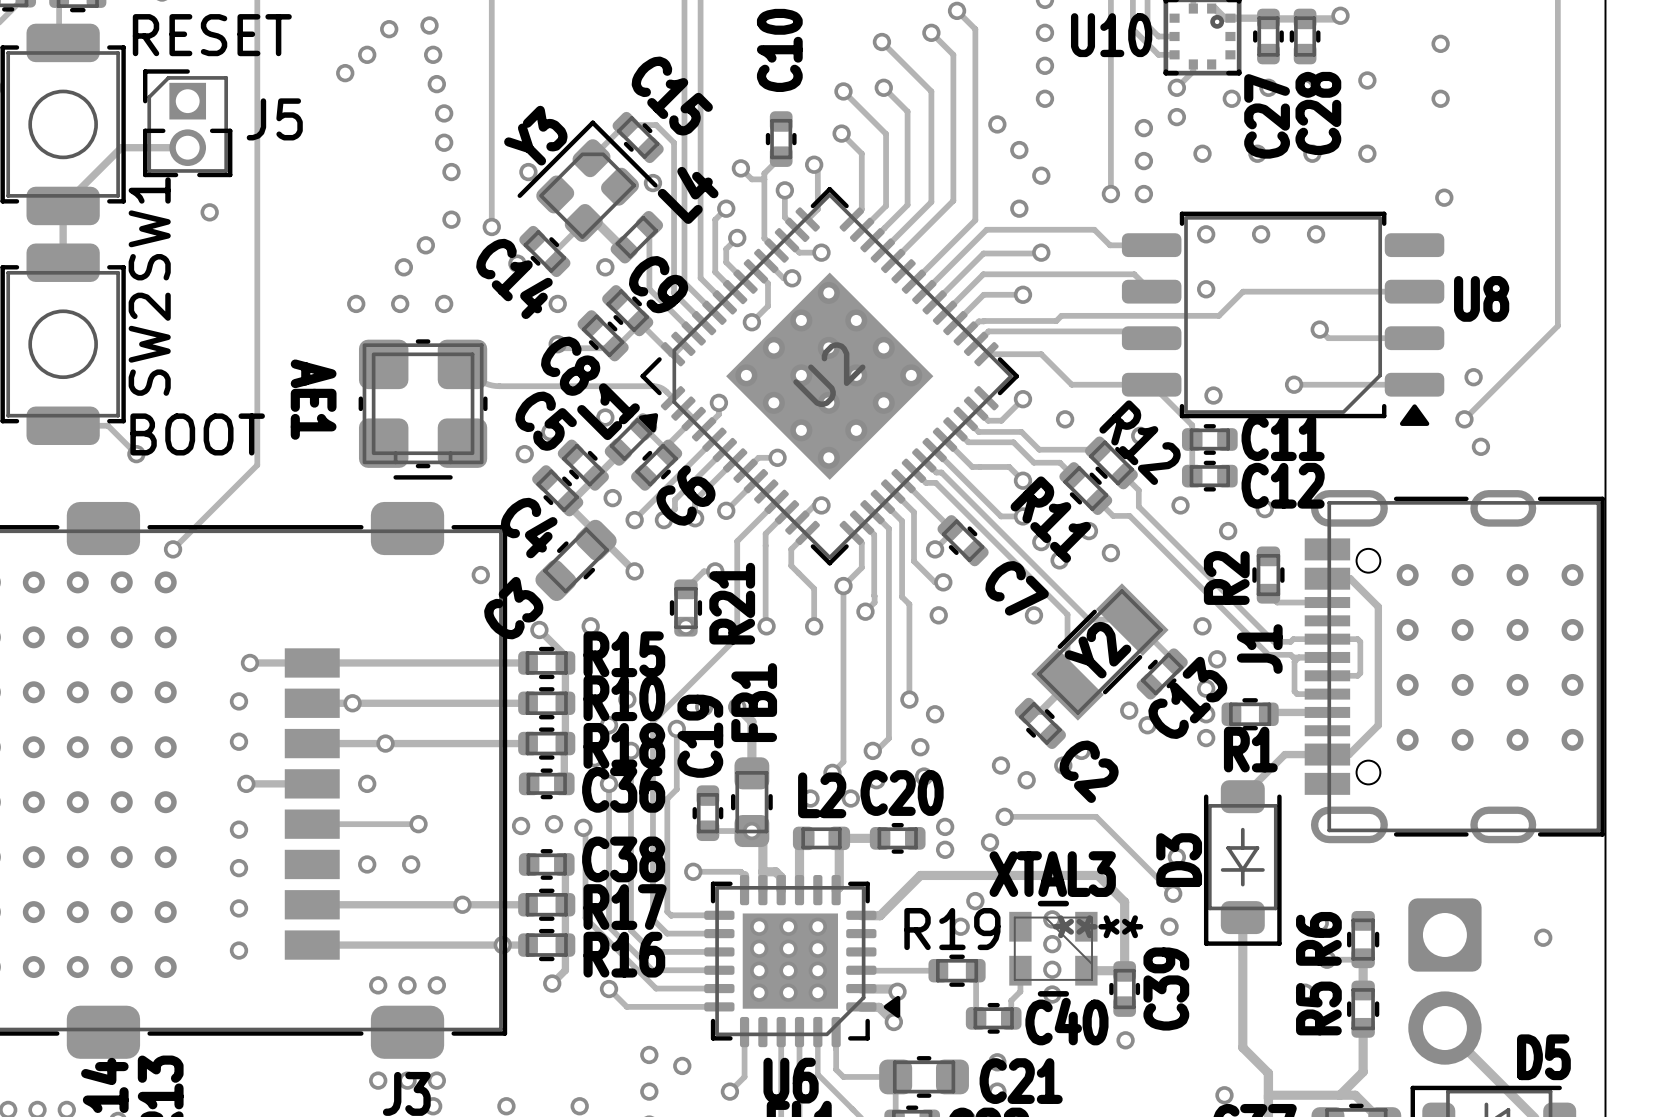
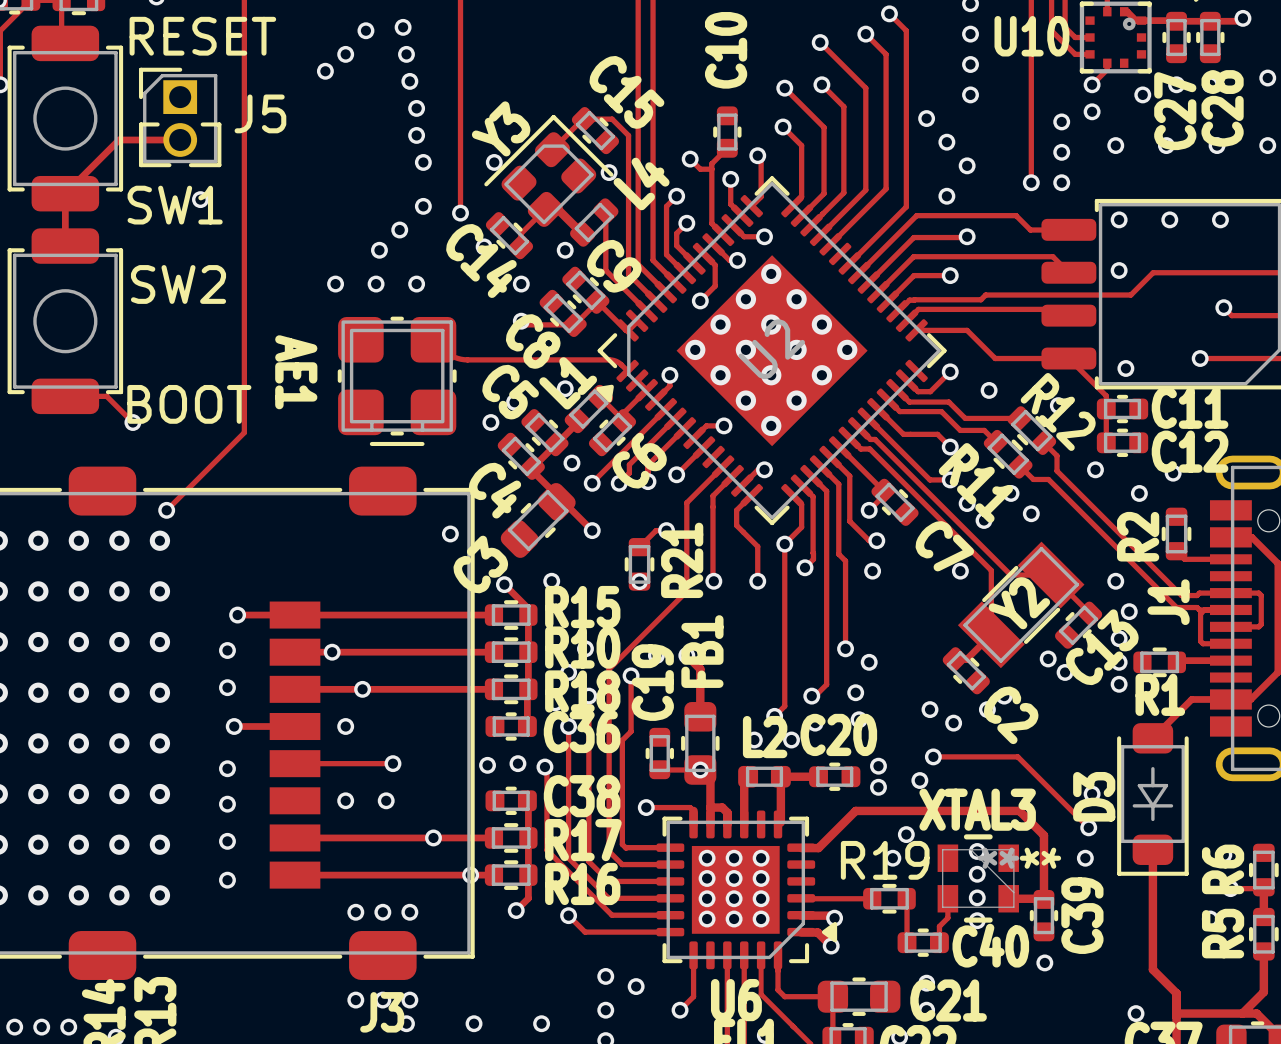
SW1 name rotation: 0° (149, 228) -> 90° clockwise (175, 205)
SW2 name rotation: 0° (149, 344) -> 90° clockwise (178, 284)

